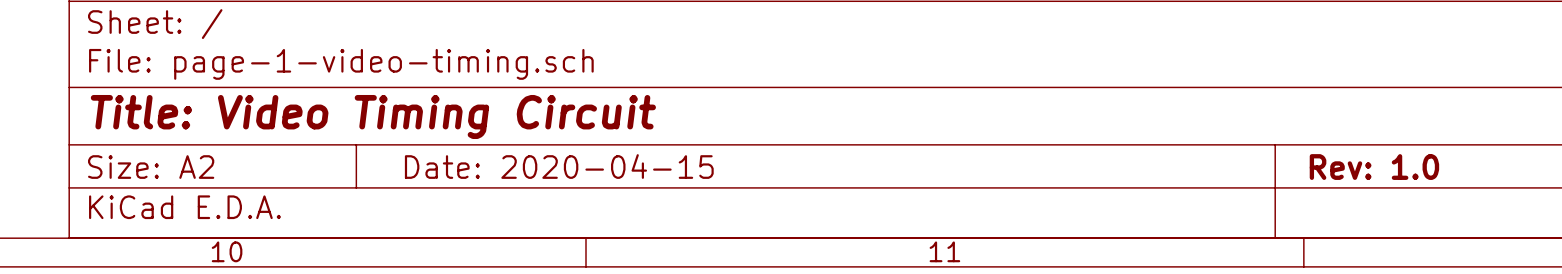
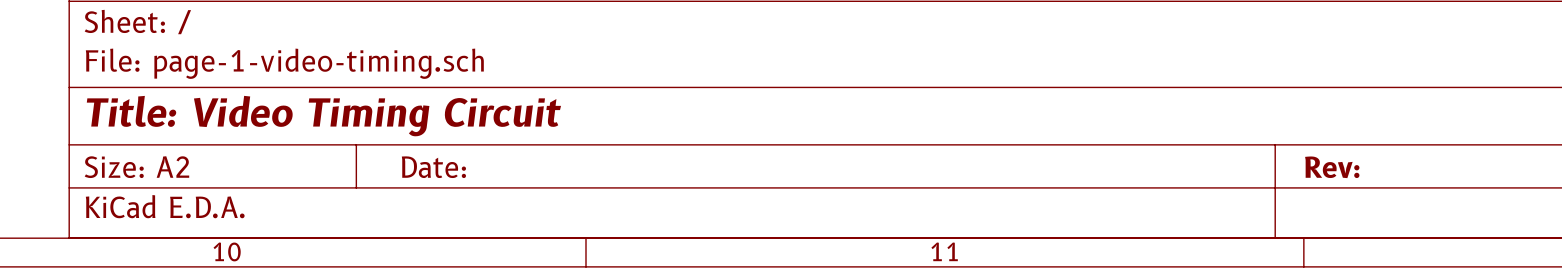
title block: Date: 2020-04-15 (559, 166) -> Date: (433, 167)
title block: Rev: 1.0 (1374, 167) -> Rev: (1332, 167)

